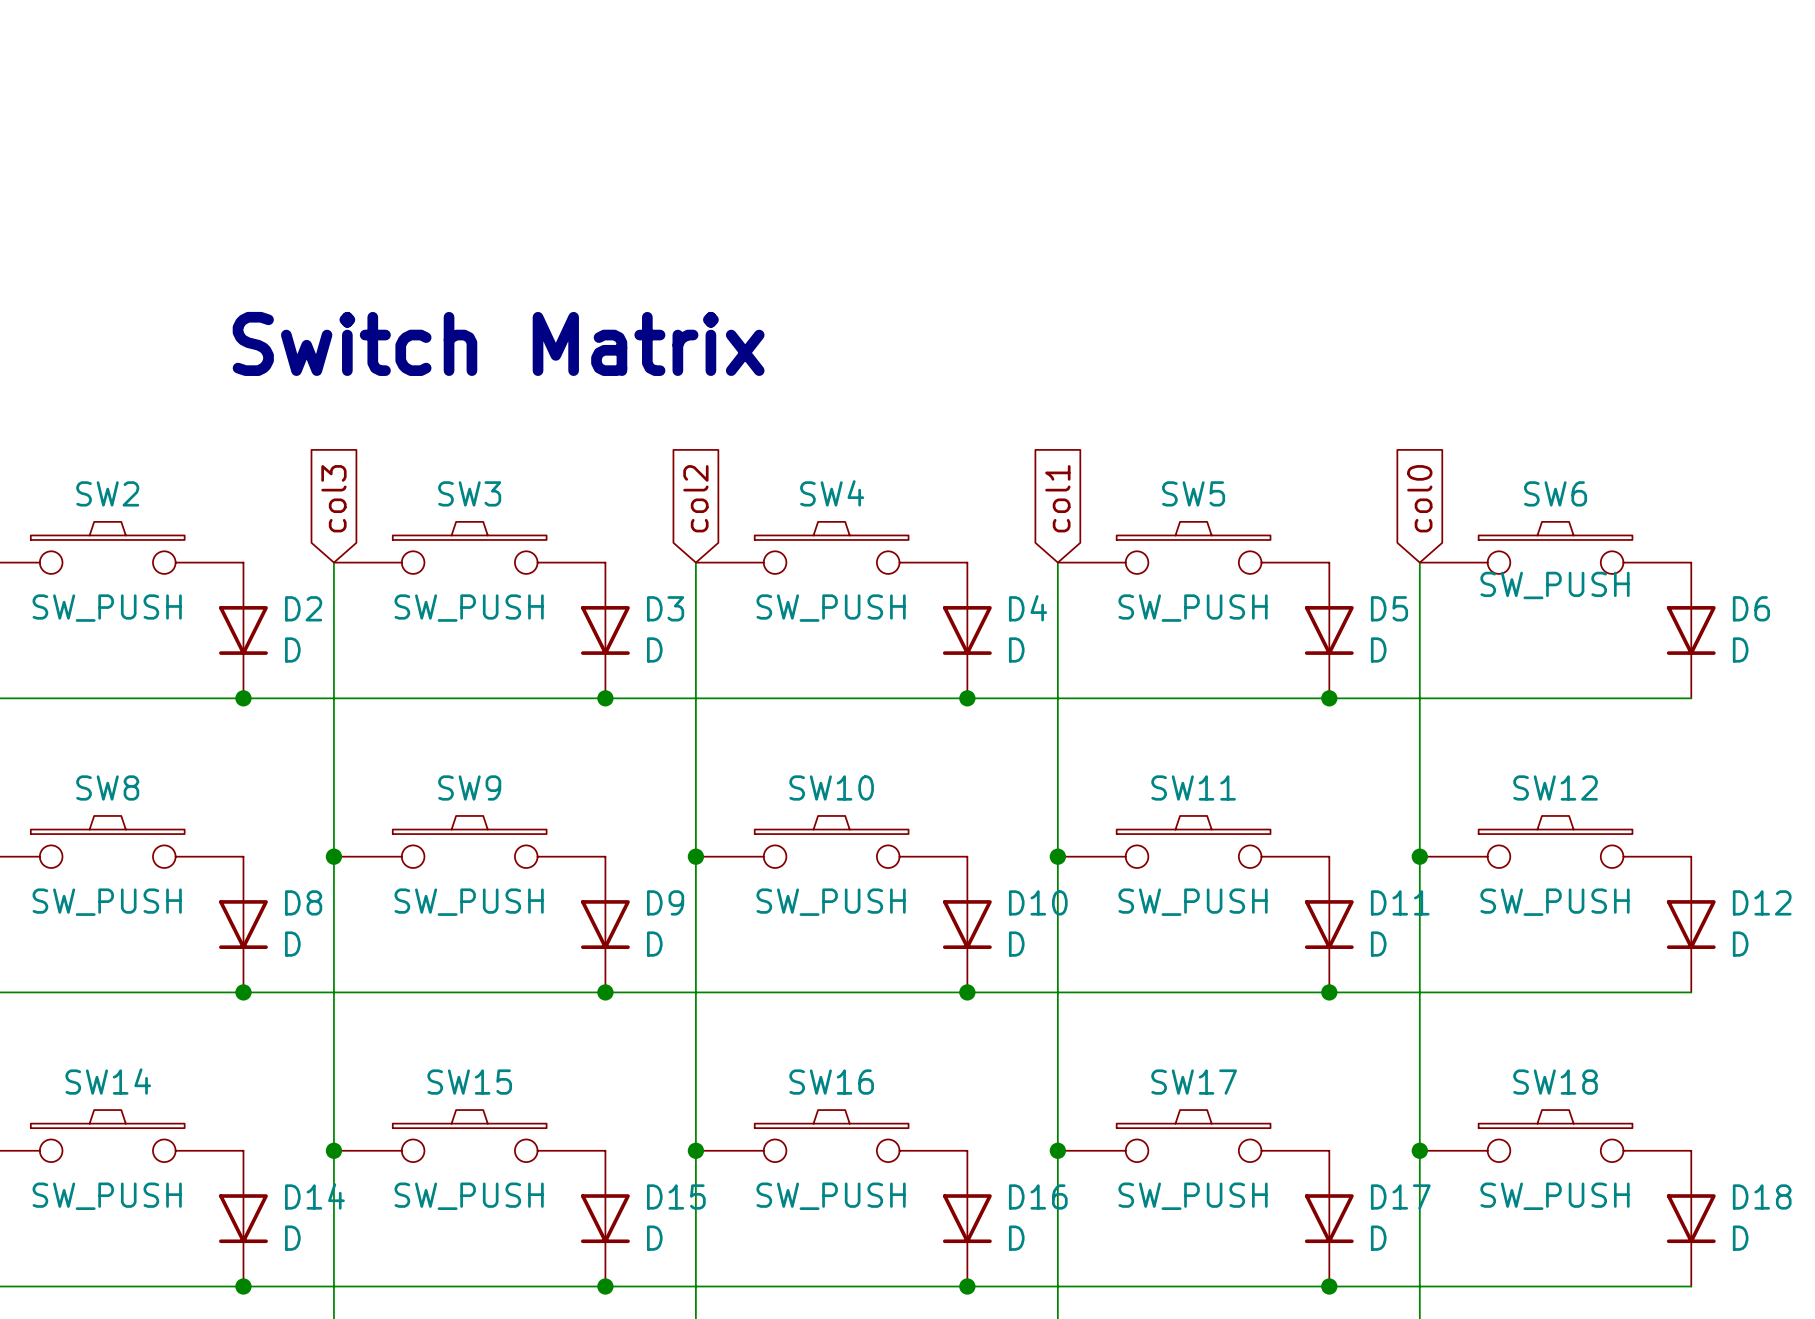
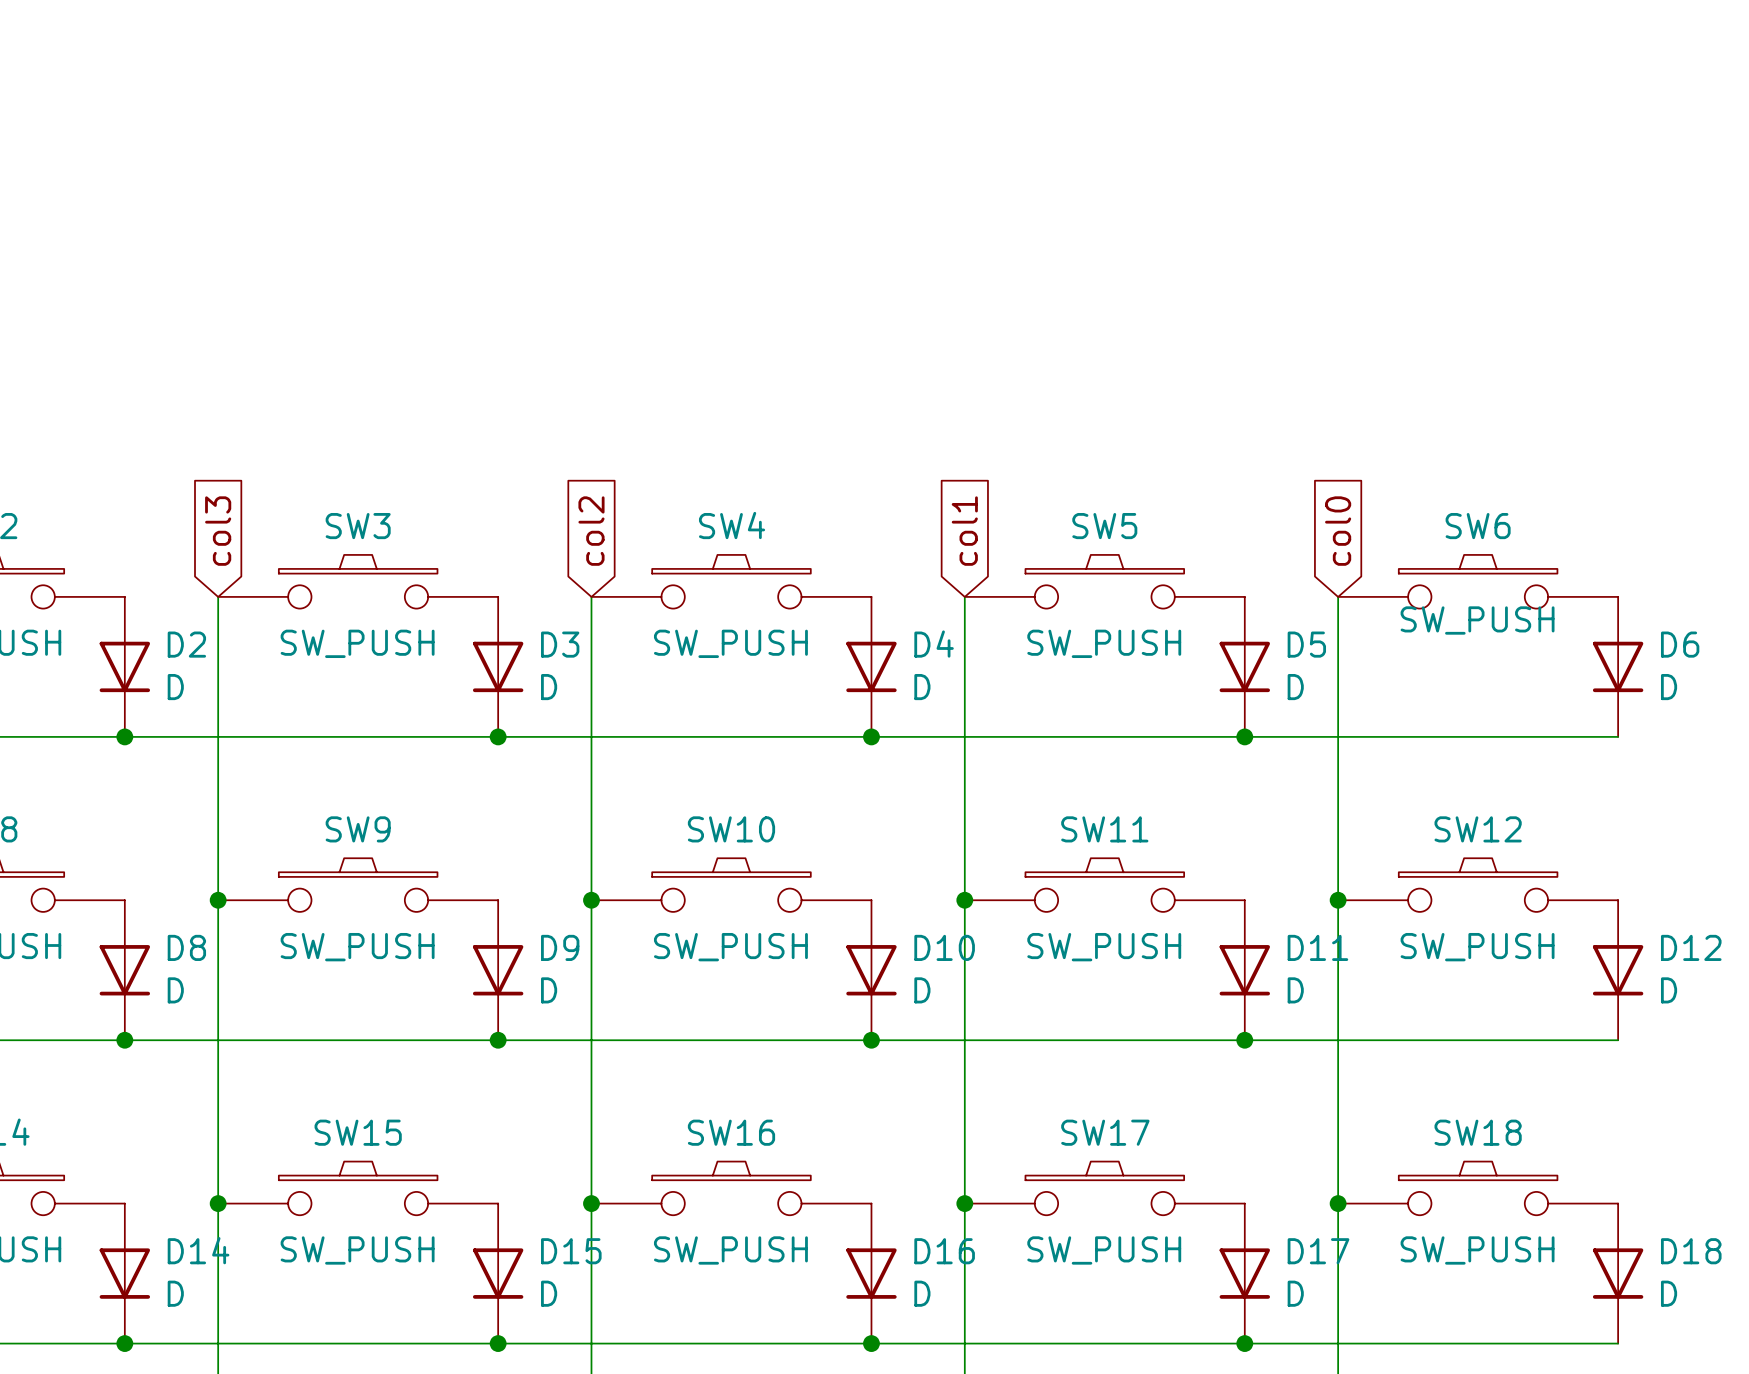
text: Switch Matrix (498, 343) -> none

